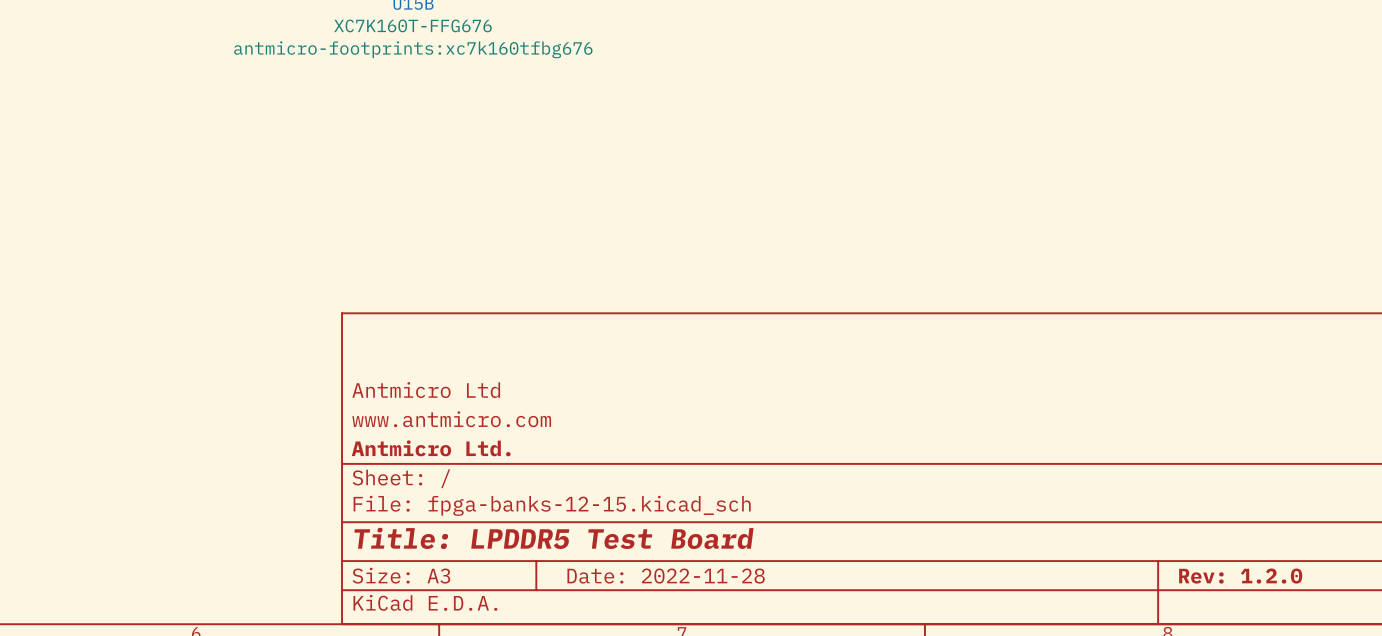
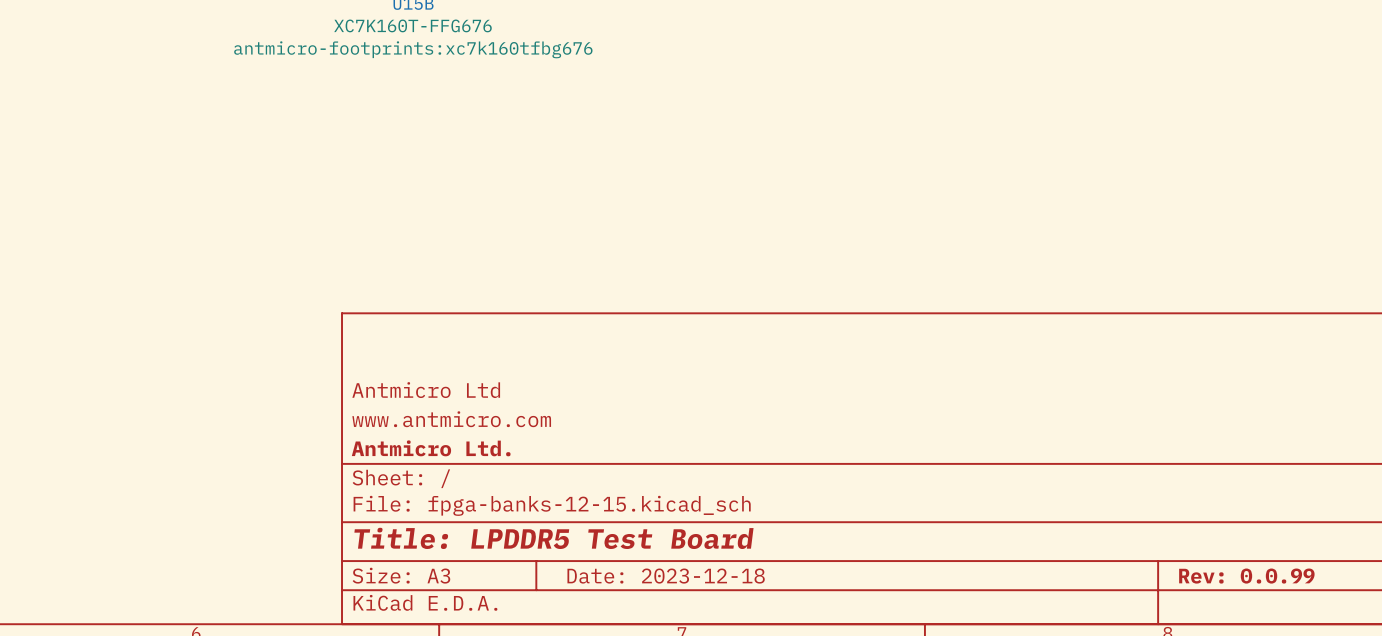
title block: Date: 2022-11-28 (666, 576) -> Date: 2023-12-18 (666, 576)
title block: Rev: 1.2.0 (1240, 576) -> Rev: 0.0.99 (1246, 576)

